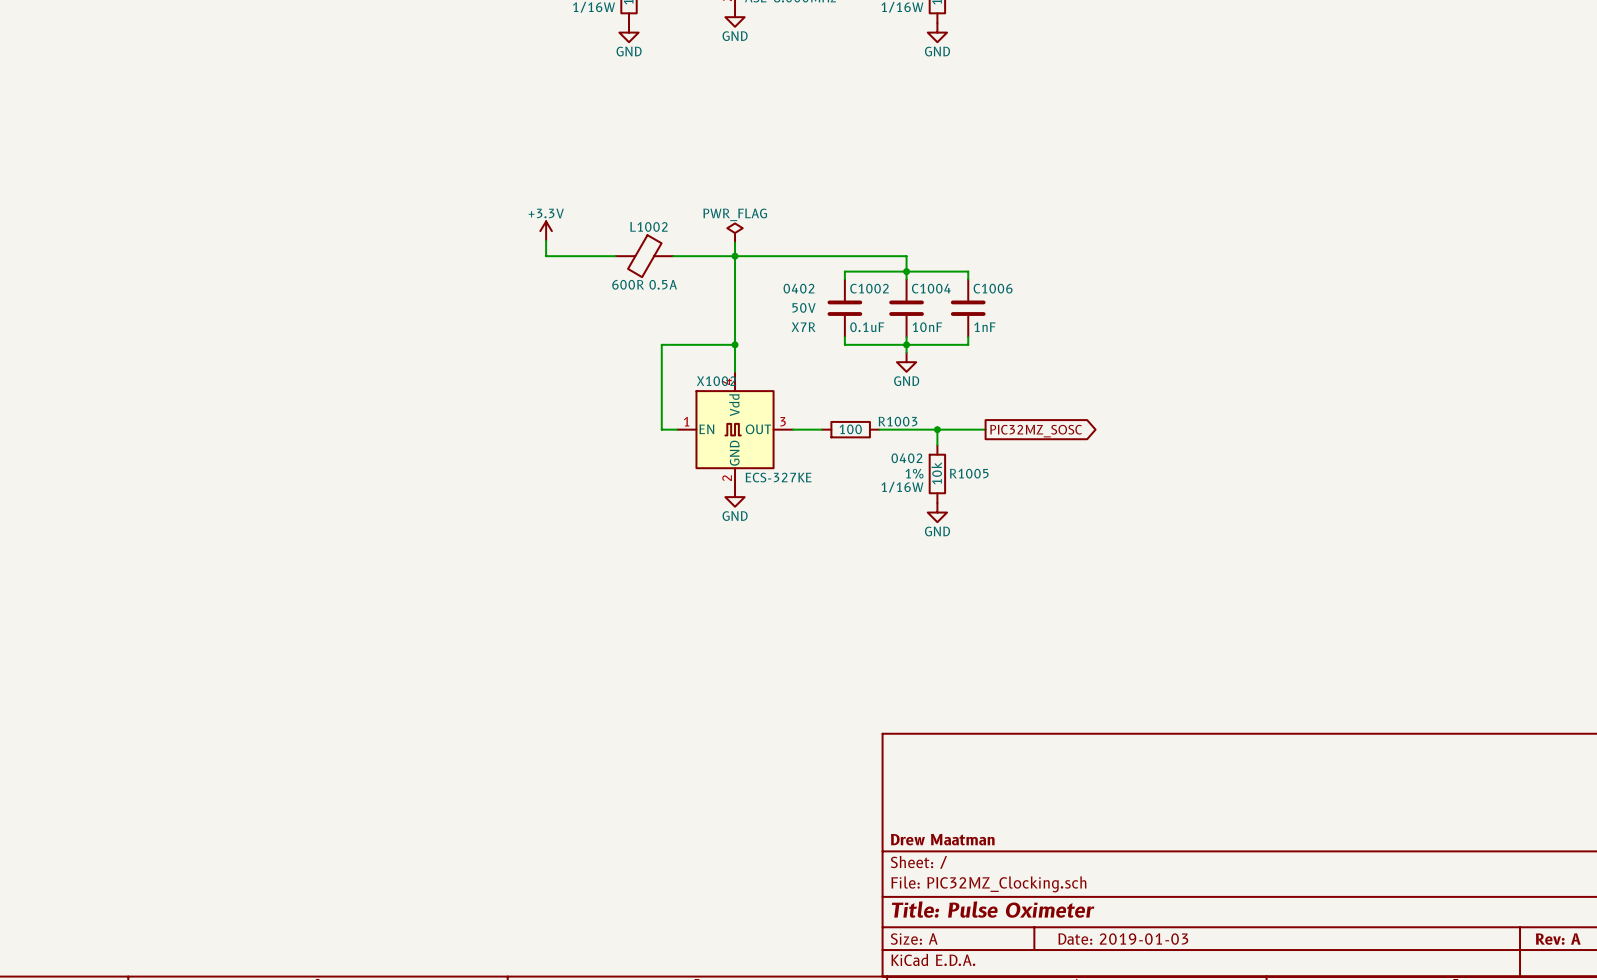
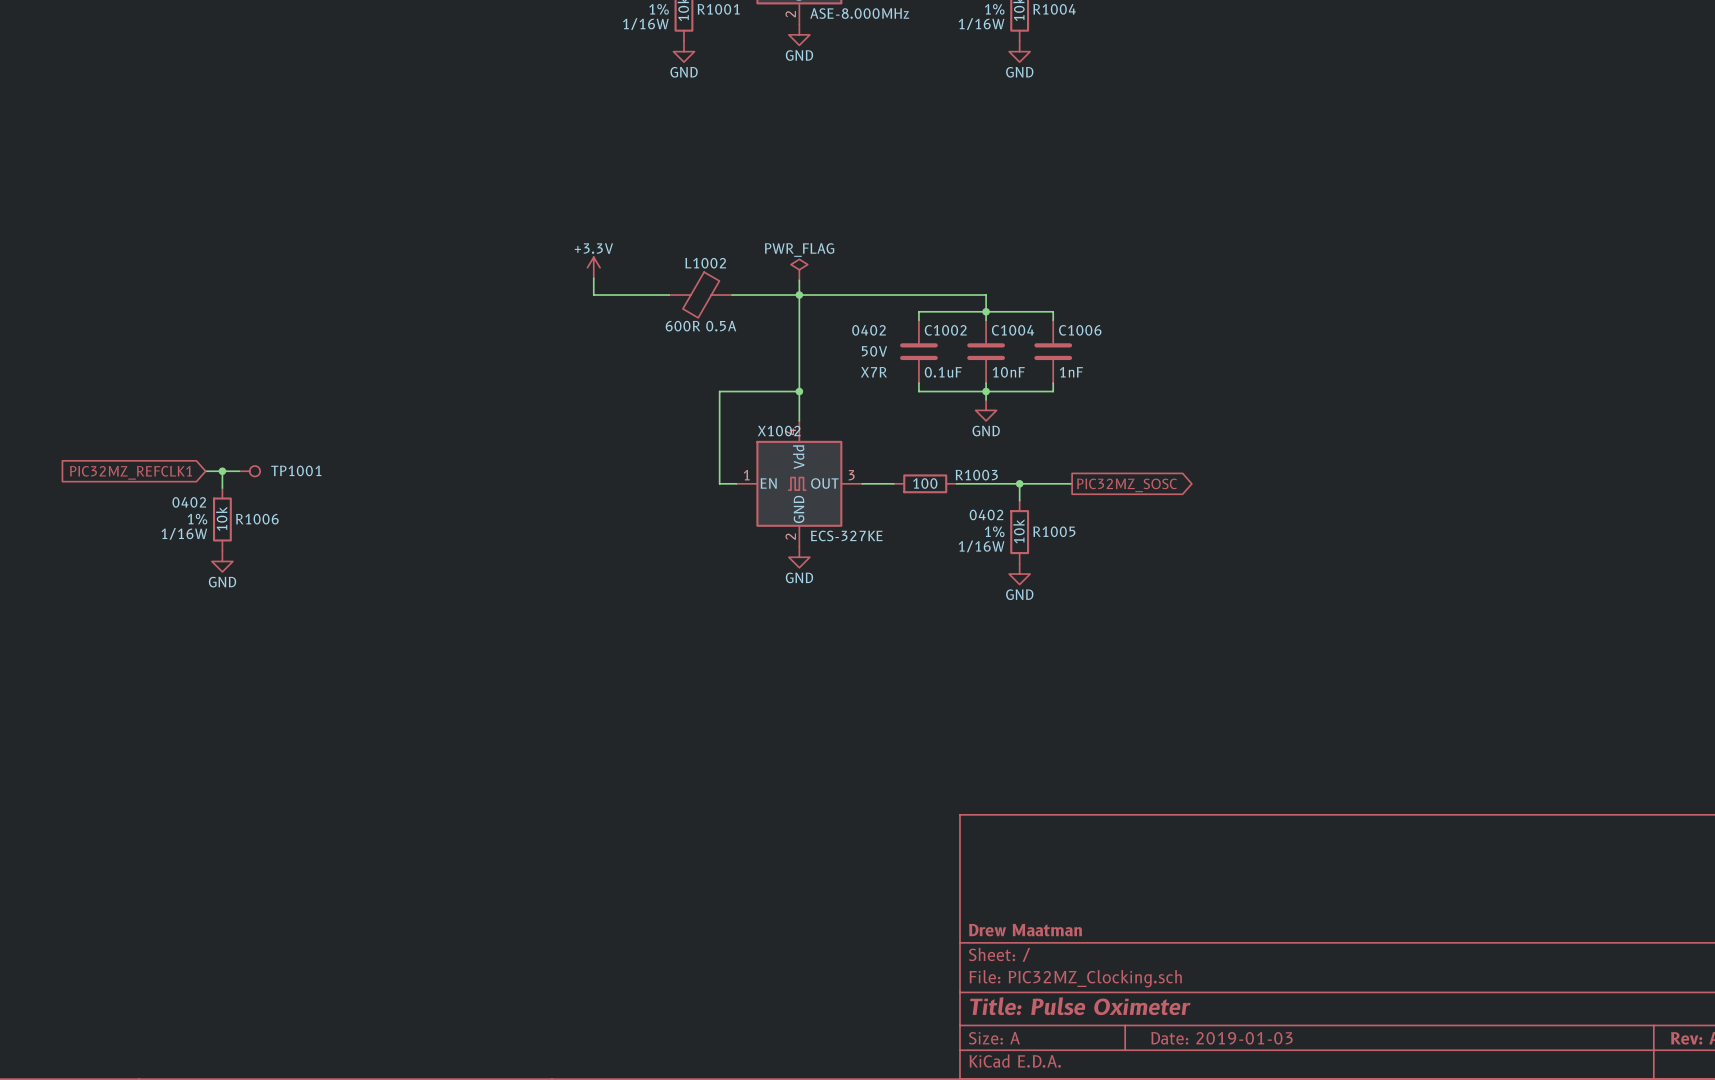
wire: none -> (205, 471) (239, 471)
wire: none -> (222, 471) (222, 488)
junction: none -> (222, 471)
TP1001: none -> (249, 471)
global label: none -> PIC32MZ_REFCLK1 (131, 472)
R1006: none -> 10k (222, 519)
power symbol: none -> GND (222, 561)

